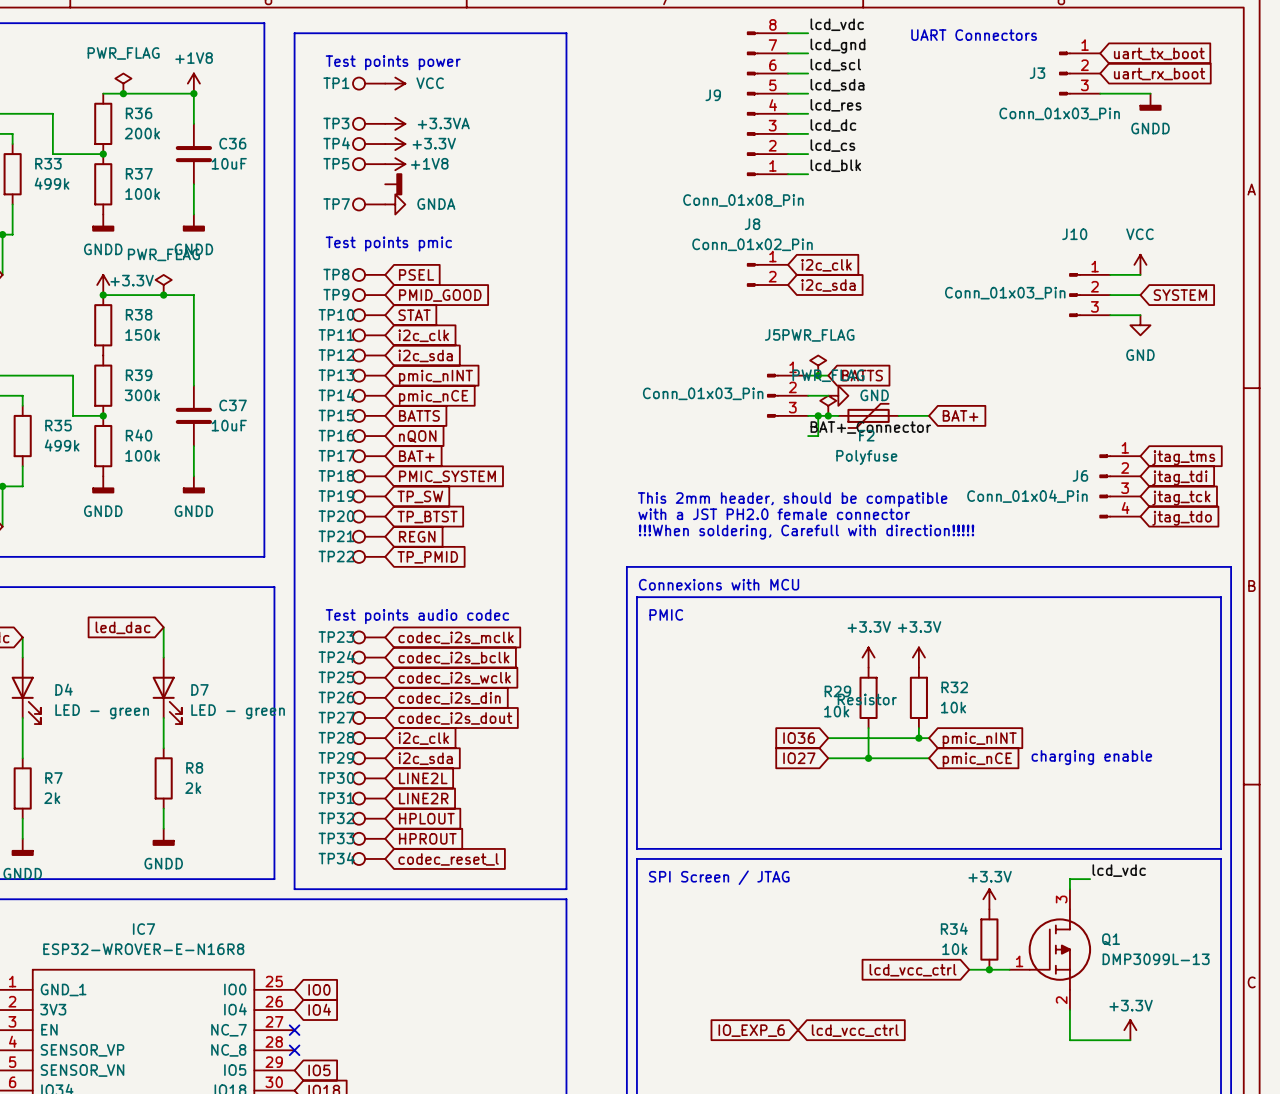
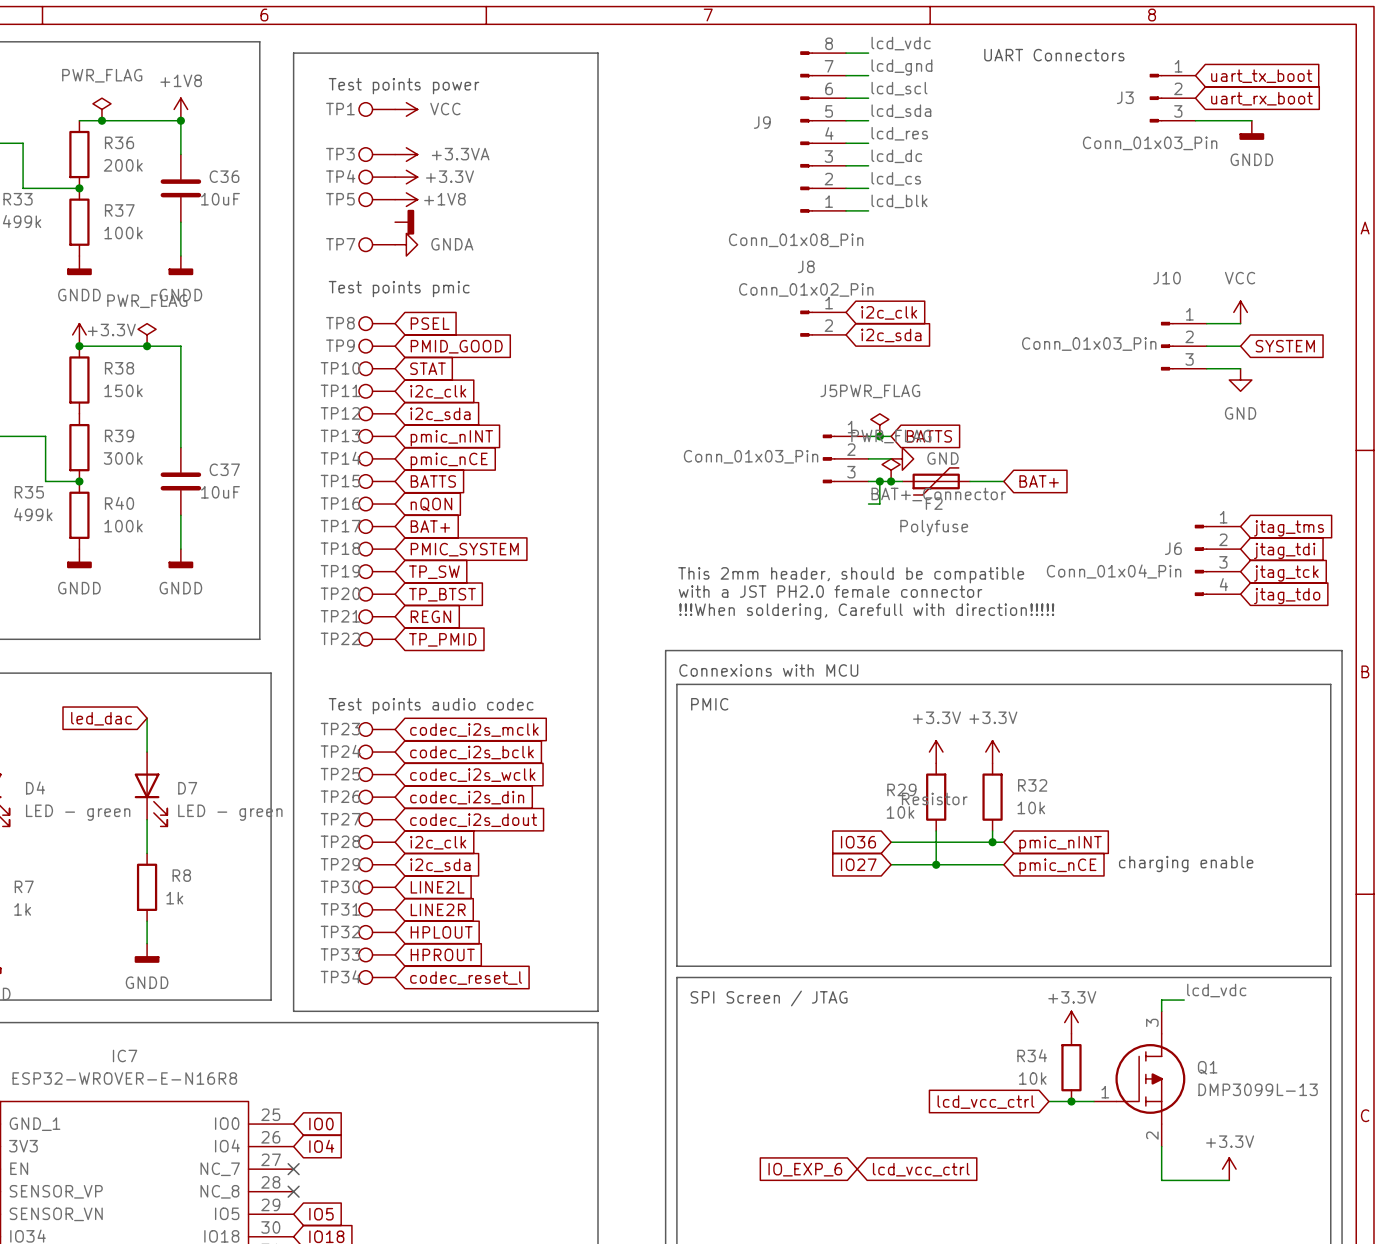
R8 value: 2k (193, 788) -> 1k (174, 898)
R7 value: 2k (52, 798) -> 1k (22, 909)

